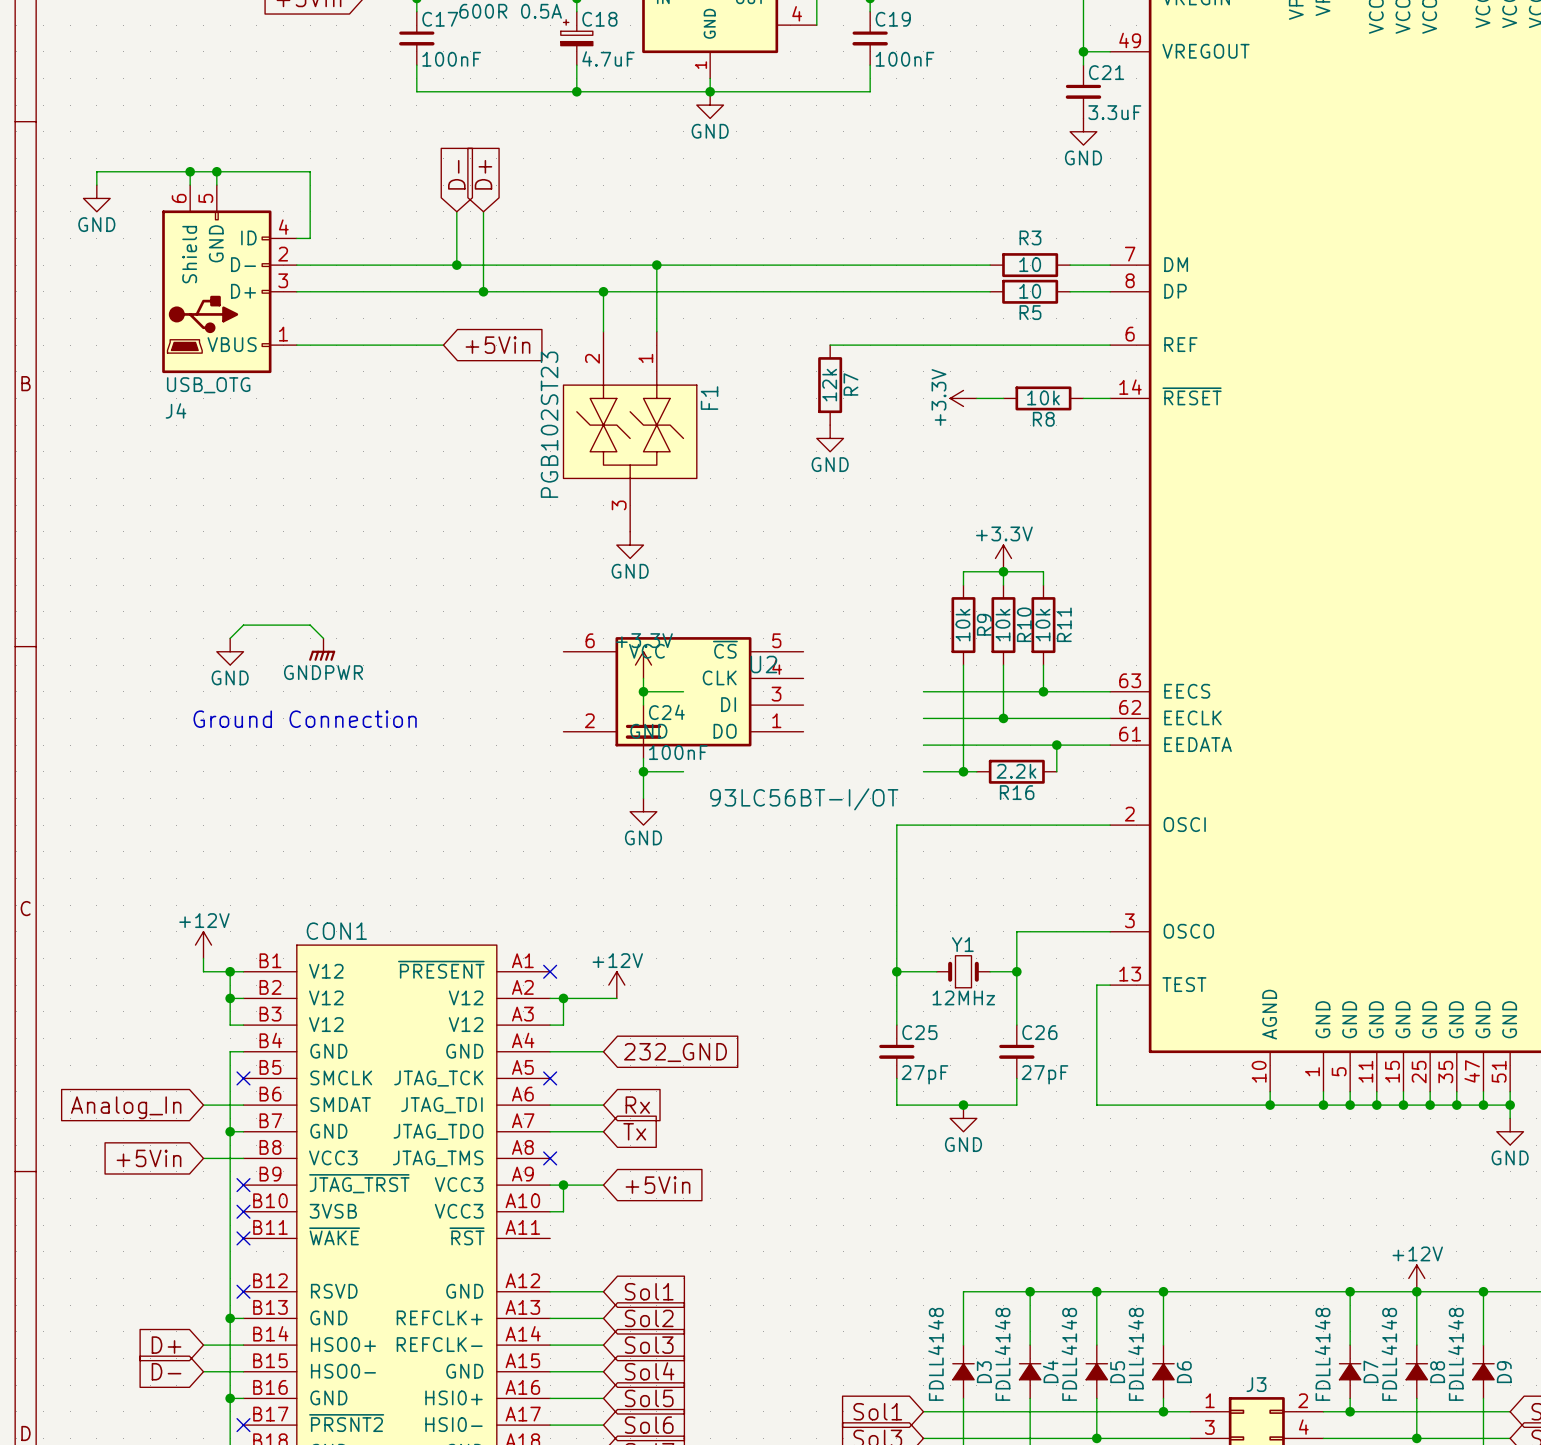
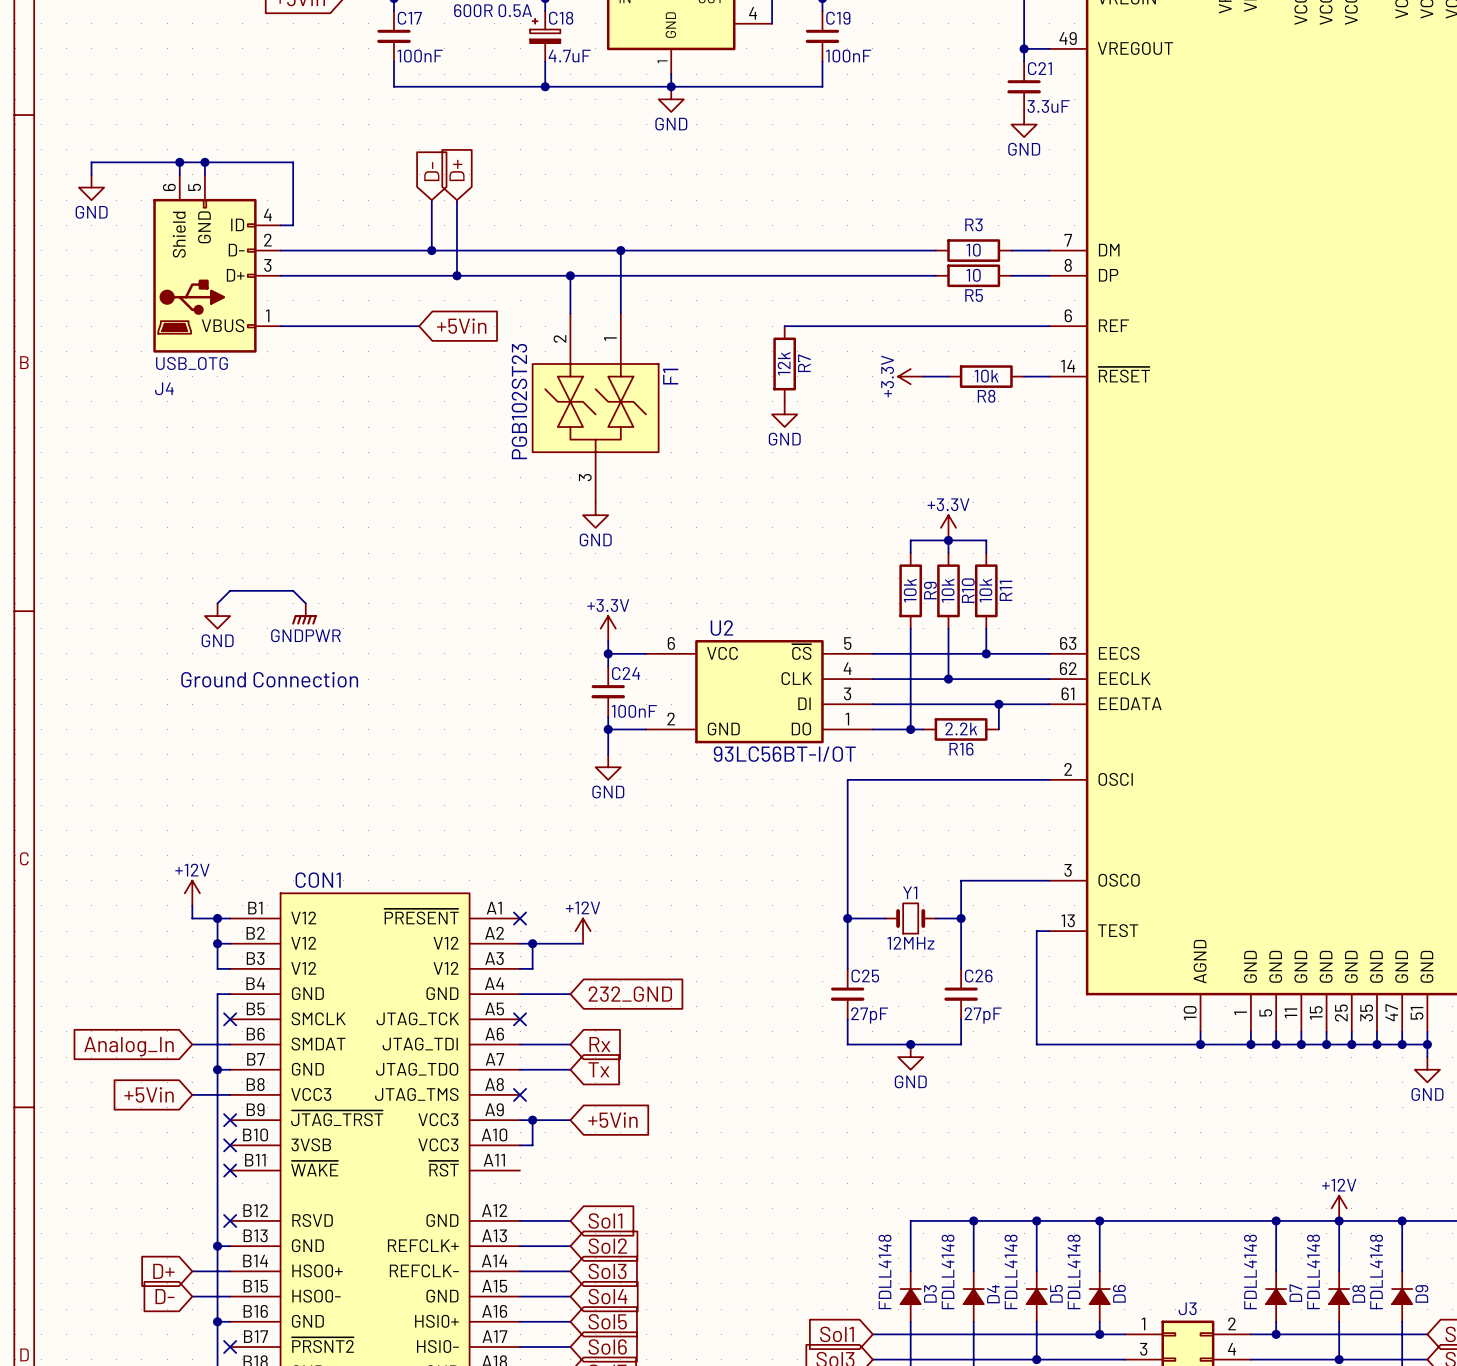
U2 position: (683, 691) -> (759, 691)
U2 value position: 93LC56BT-I/OT (804, 799) -> 93LC56BT-I/OT (784, 754)

